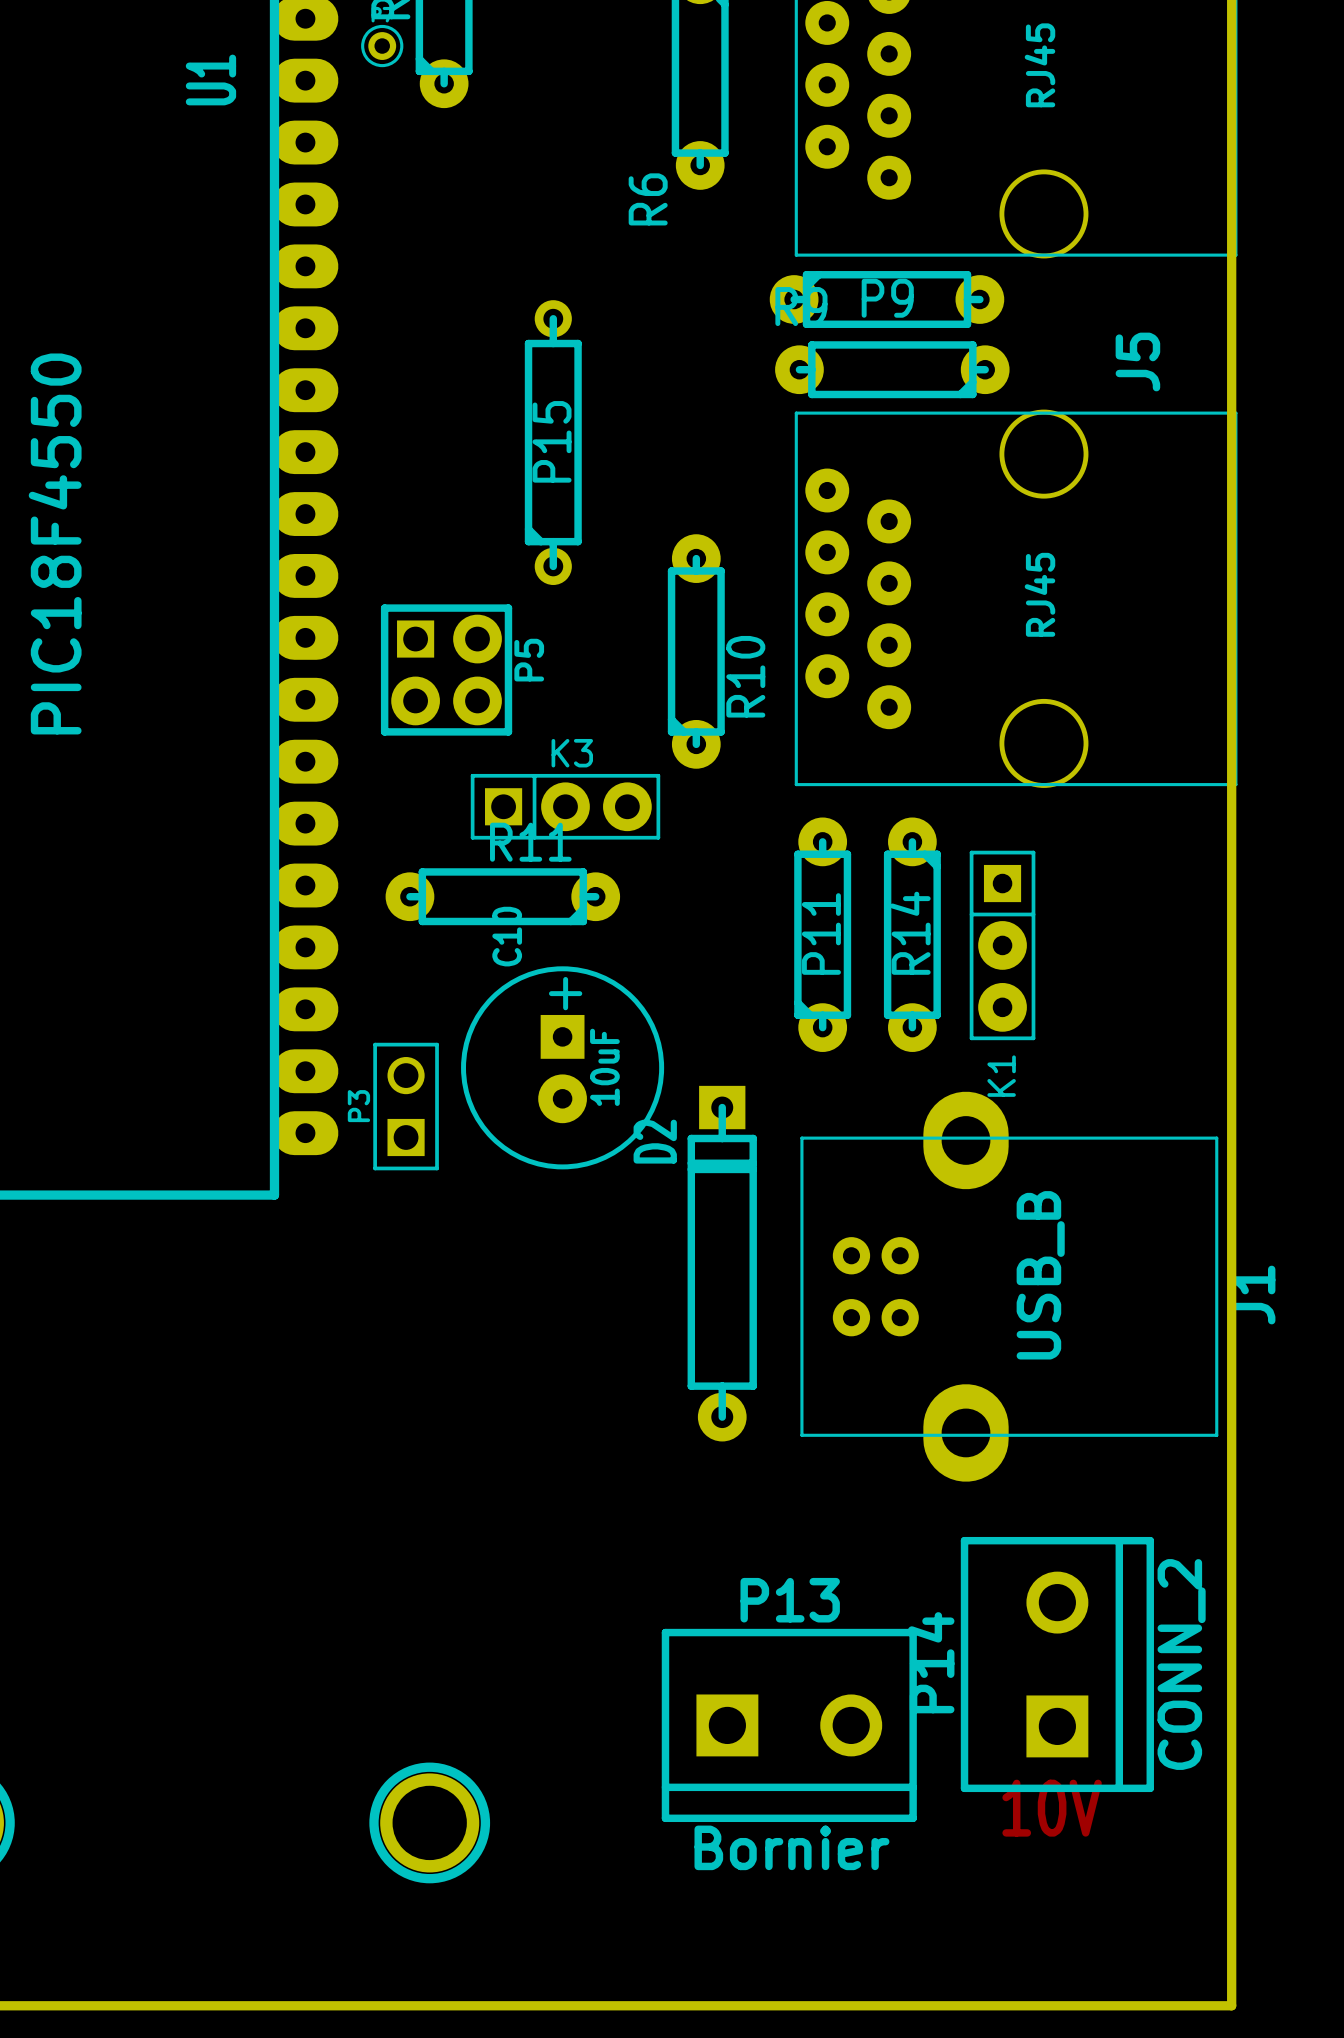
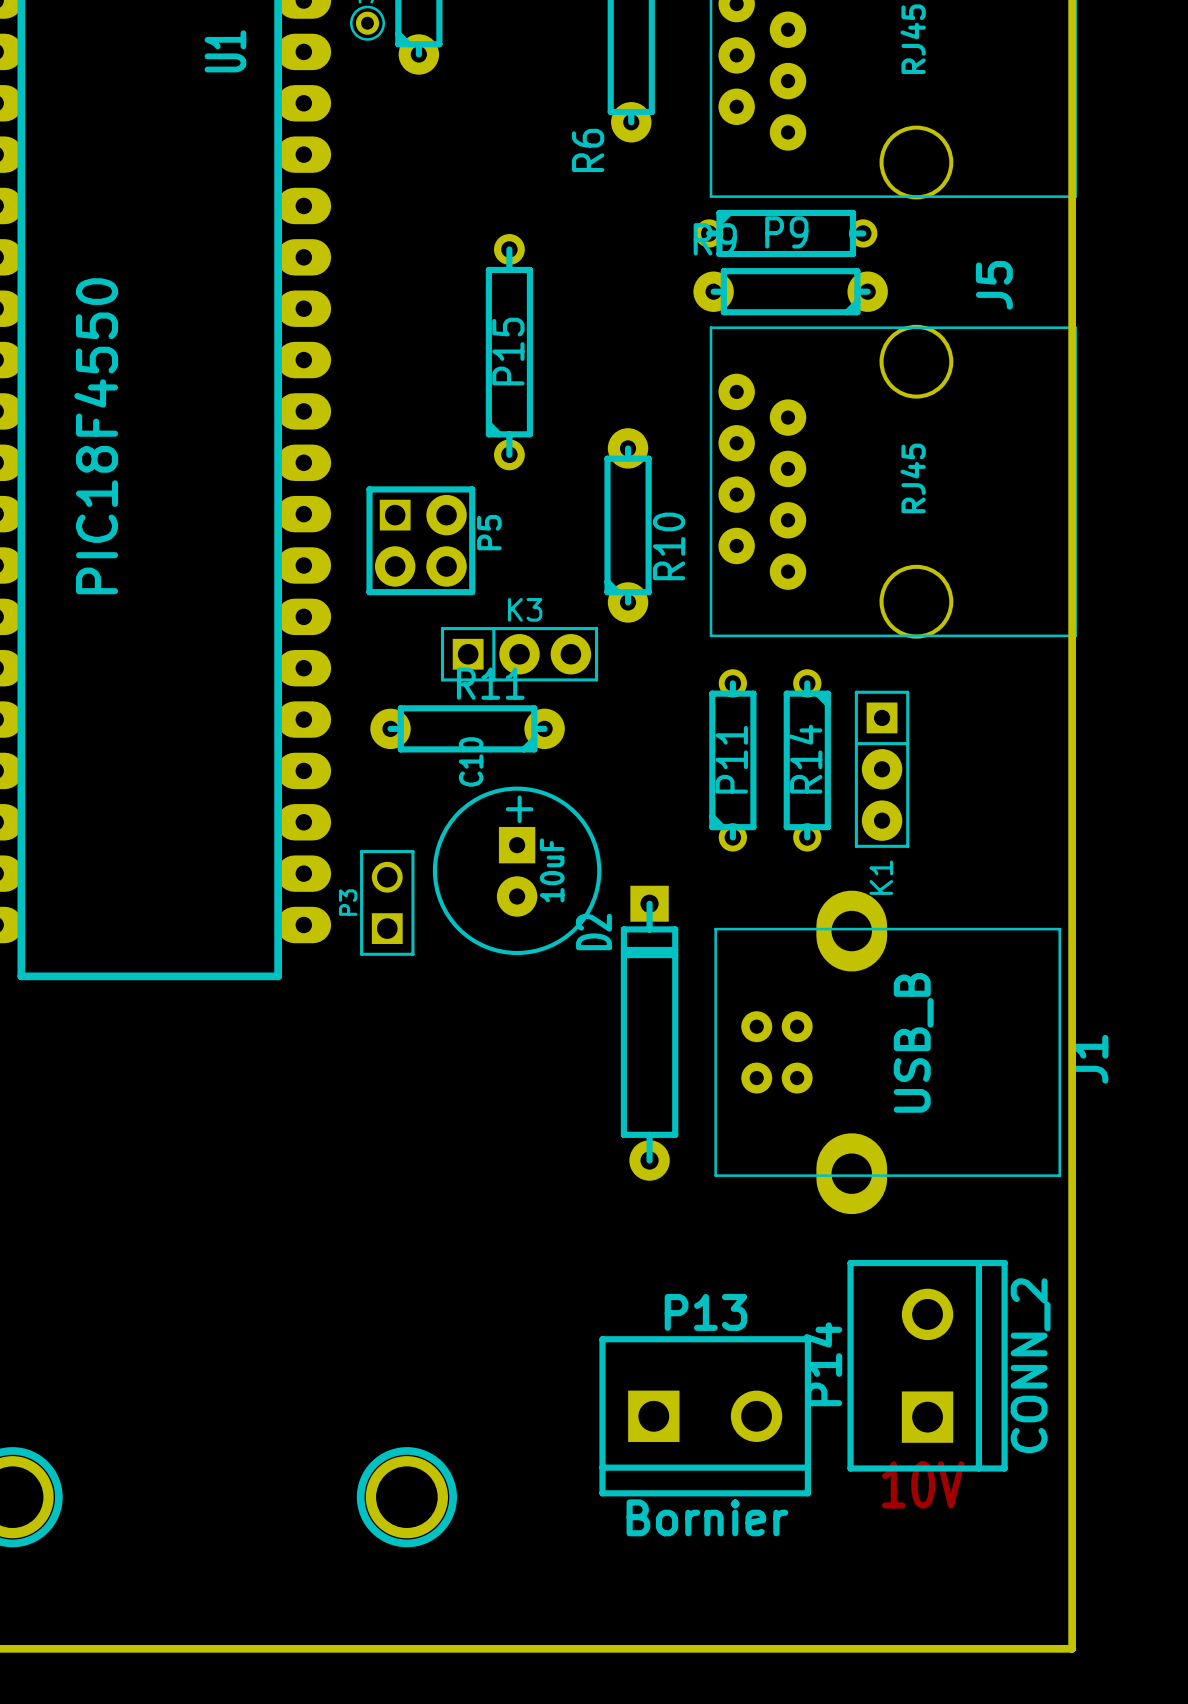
P9 footprint: [769, 271, 1005, 328] -> [695, 209, 878, 258]
P11 footprint: [794, 817, 852, 1052] -> [709, 669, 757, 852]
R14 footprint: [883, 817, 941, 1052] -> [783, 669, 831, 852]

